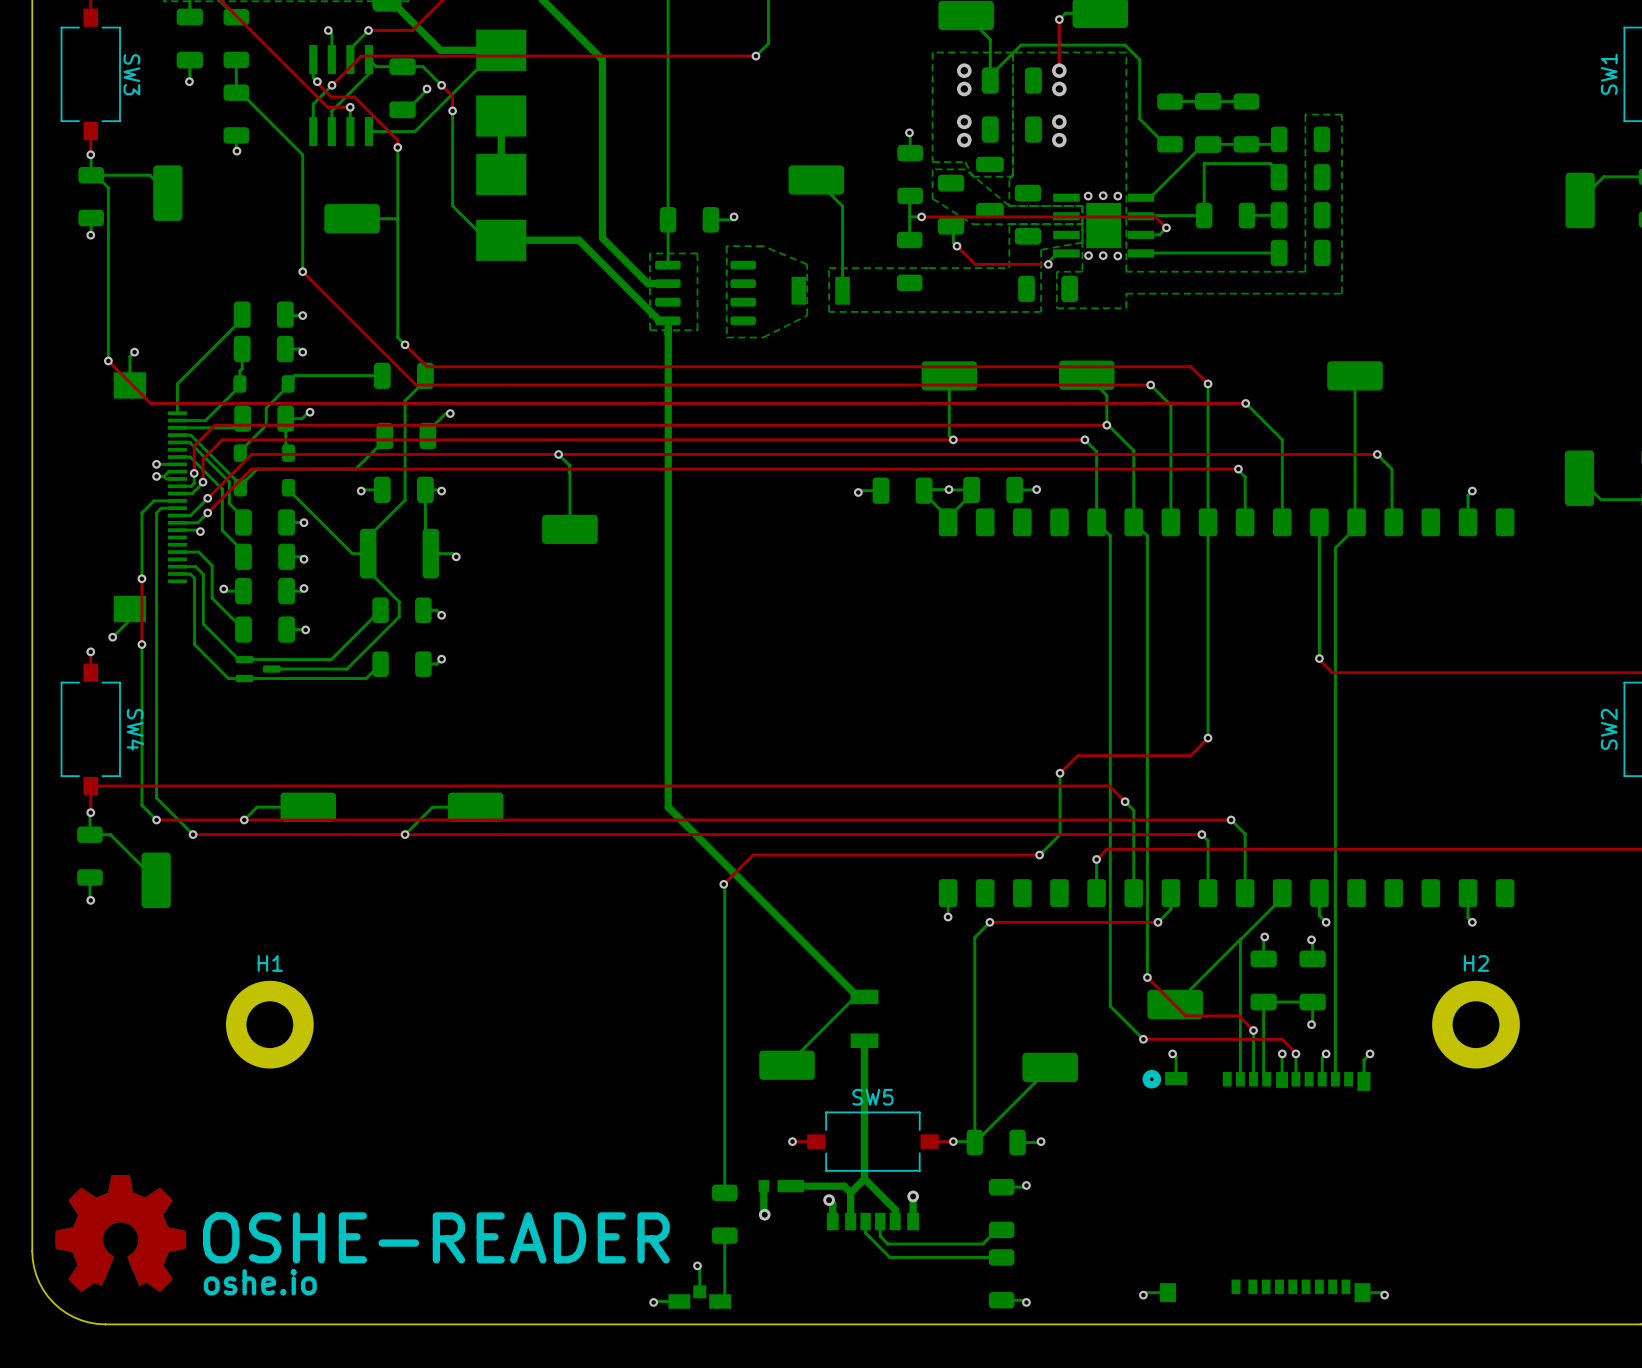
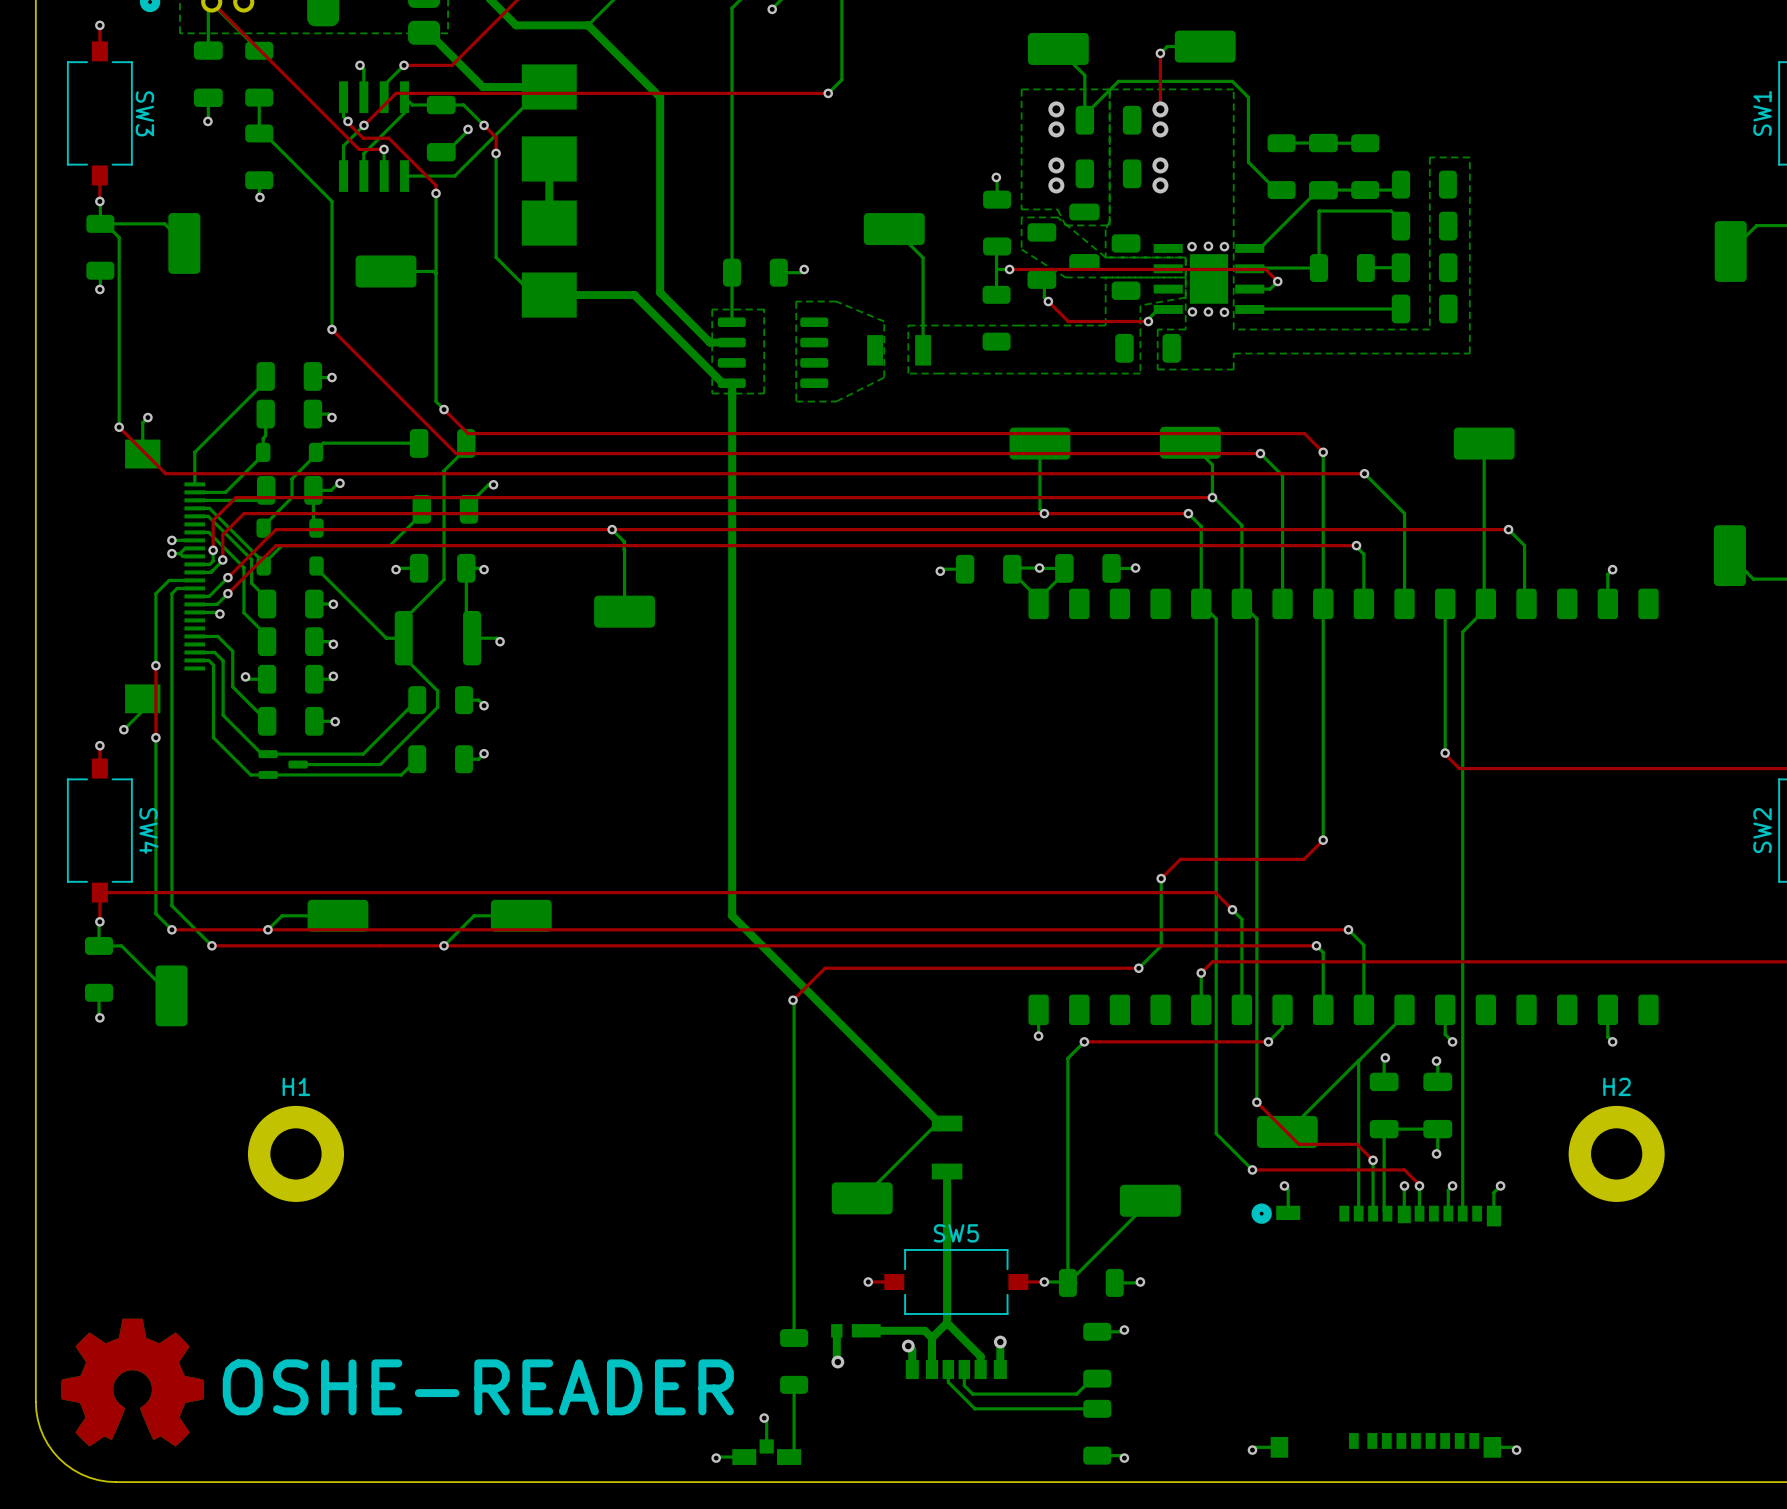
text: oshe.io (260, 1282) -> none

